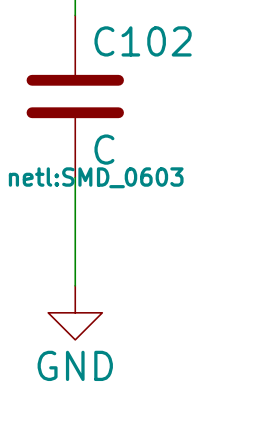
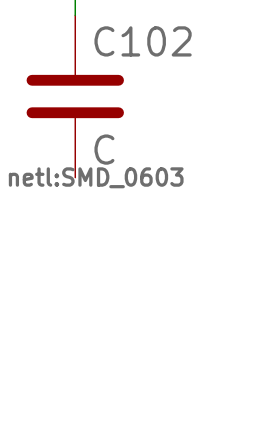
wire: (75, 177) (75, 285) -> none
power symbol: GND (75, 312) -> none

